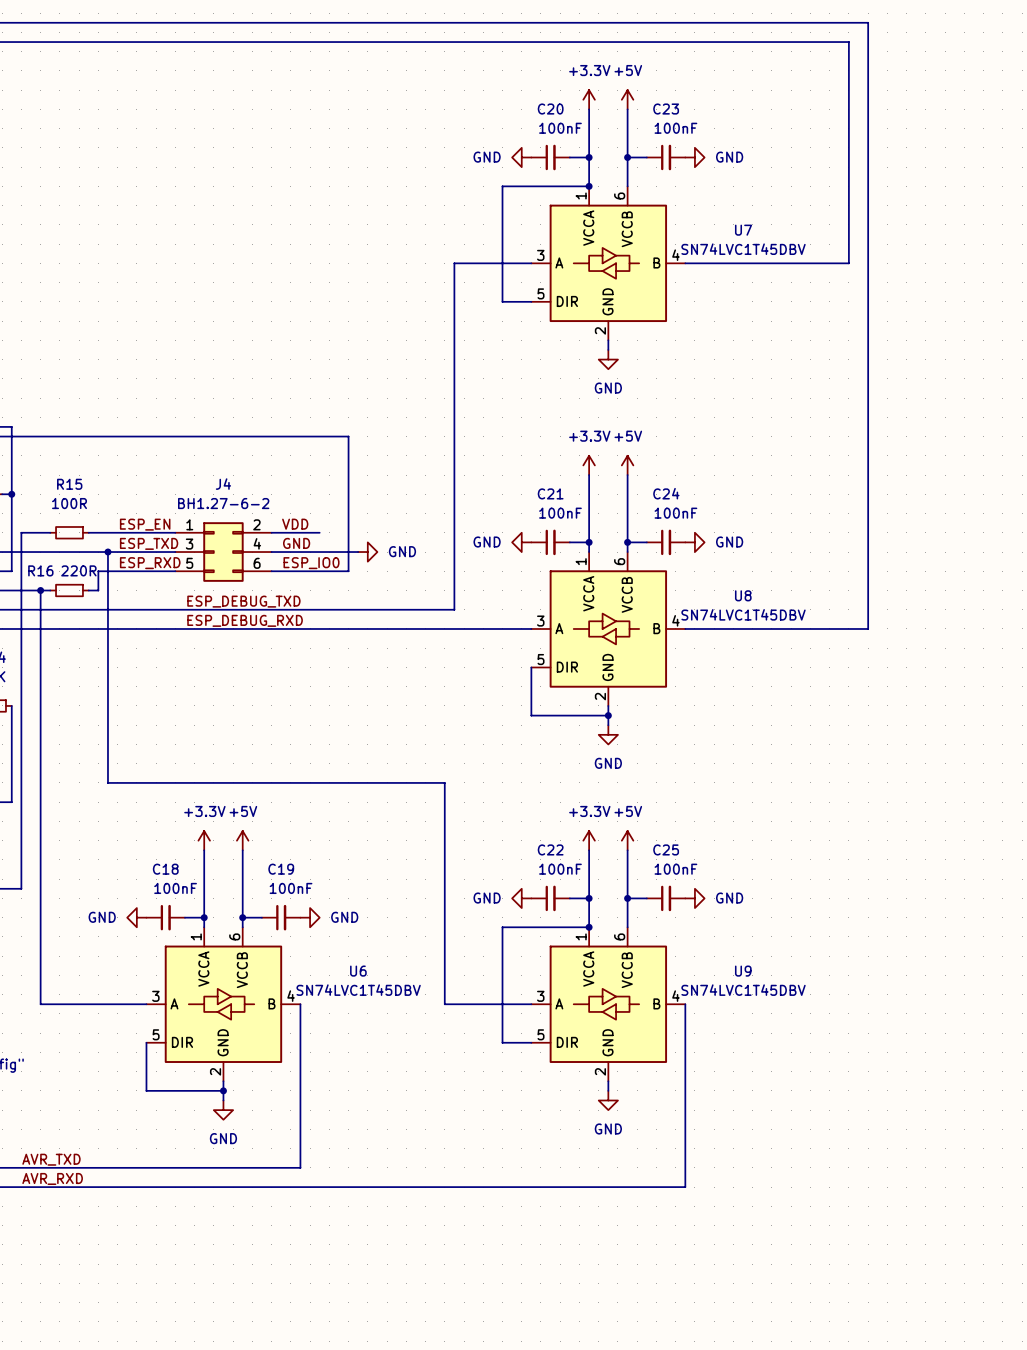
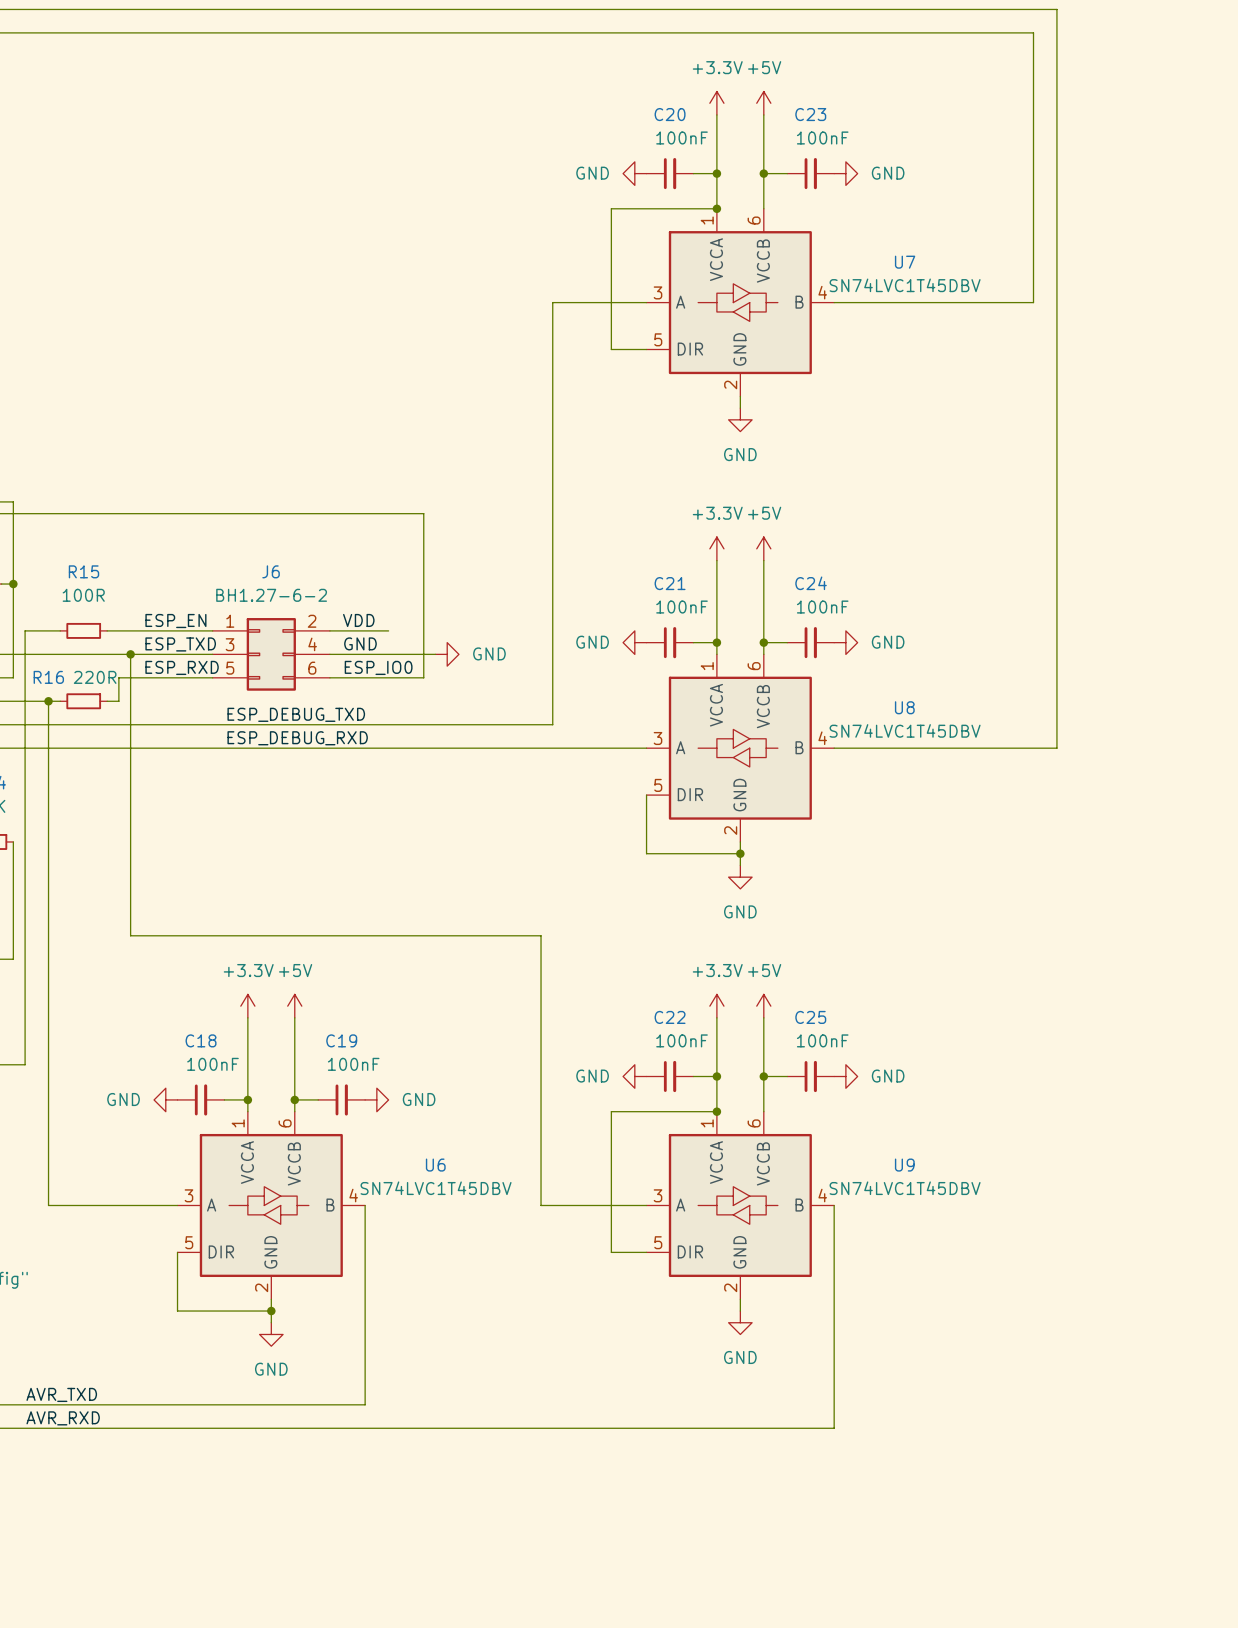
J4 name: J4 (223, 484) -> J6 (271, 571)

